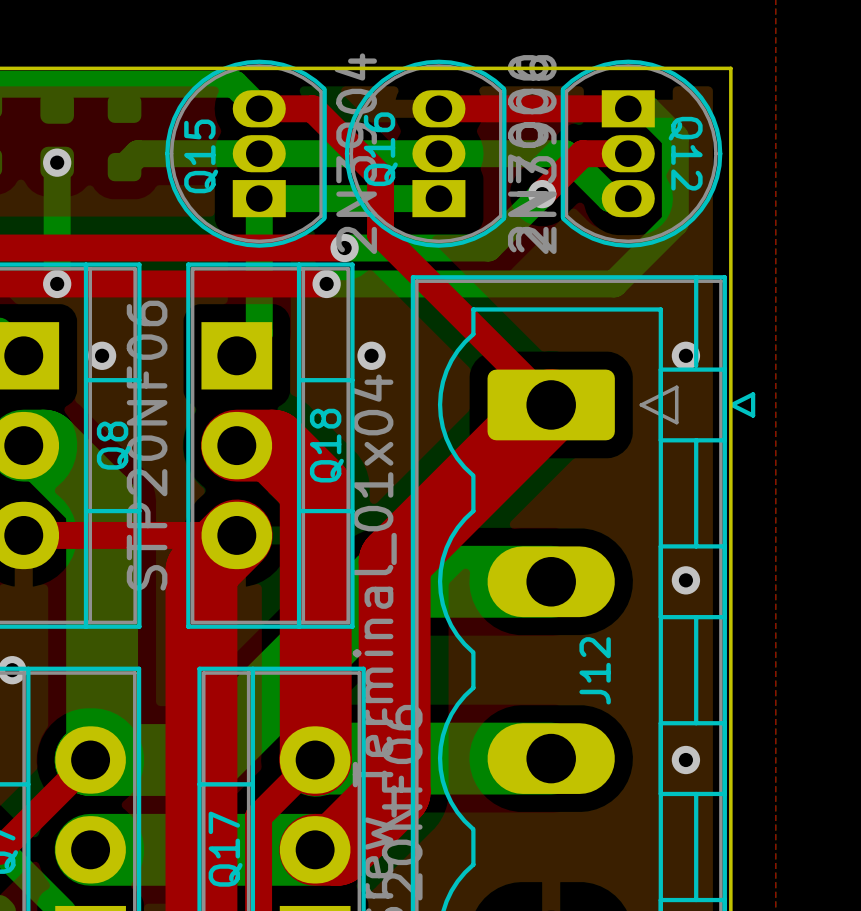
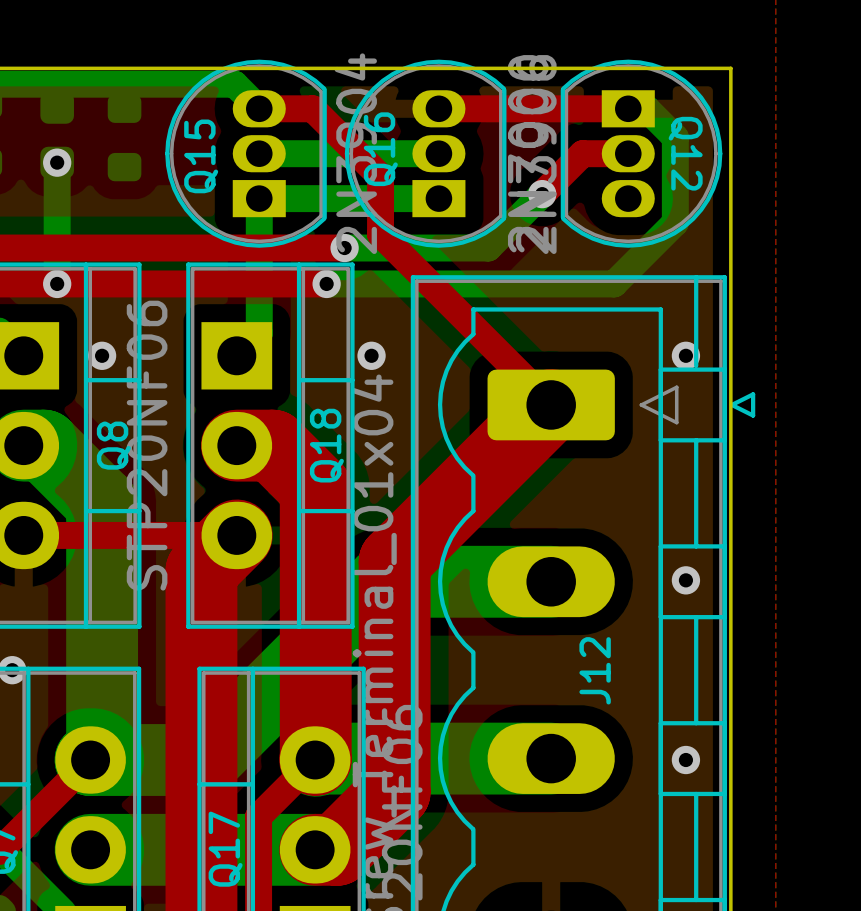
bottom track: (259, 153) (137, 153) (124, 167) -> none
bottom track: (438, 153) (565, 153) (609, 198) (628, 198) -> none

